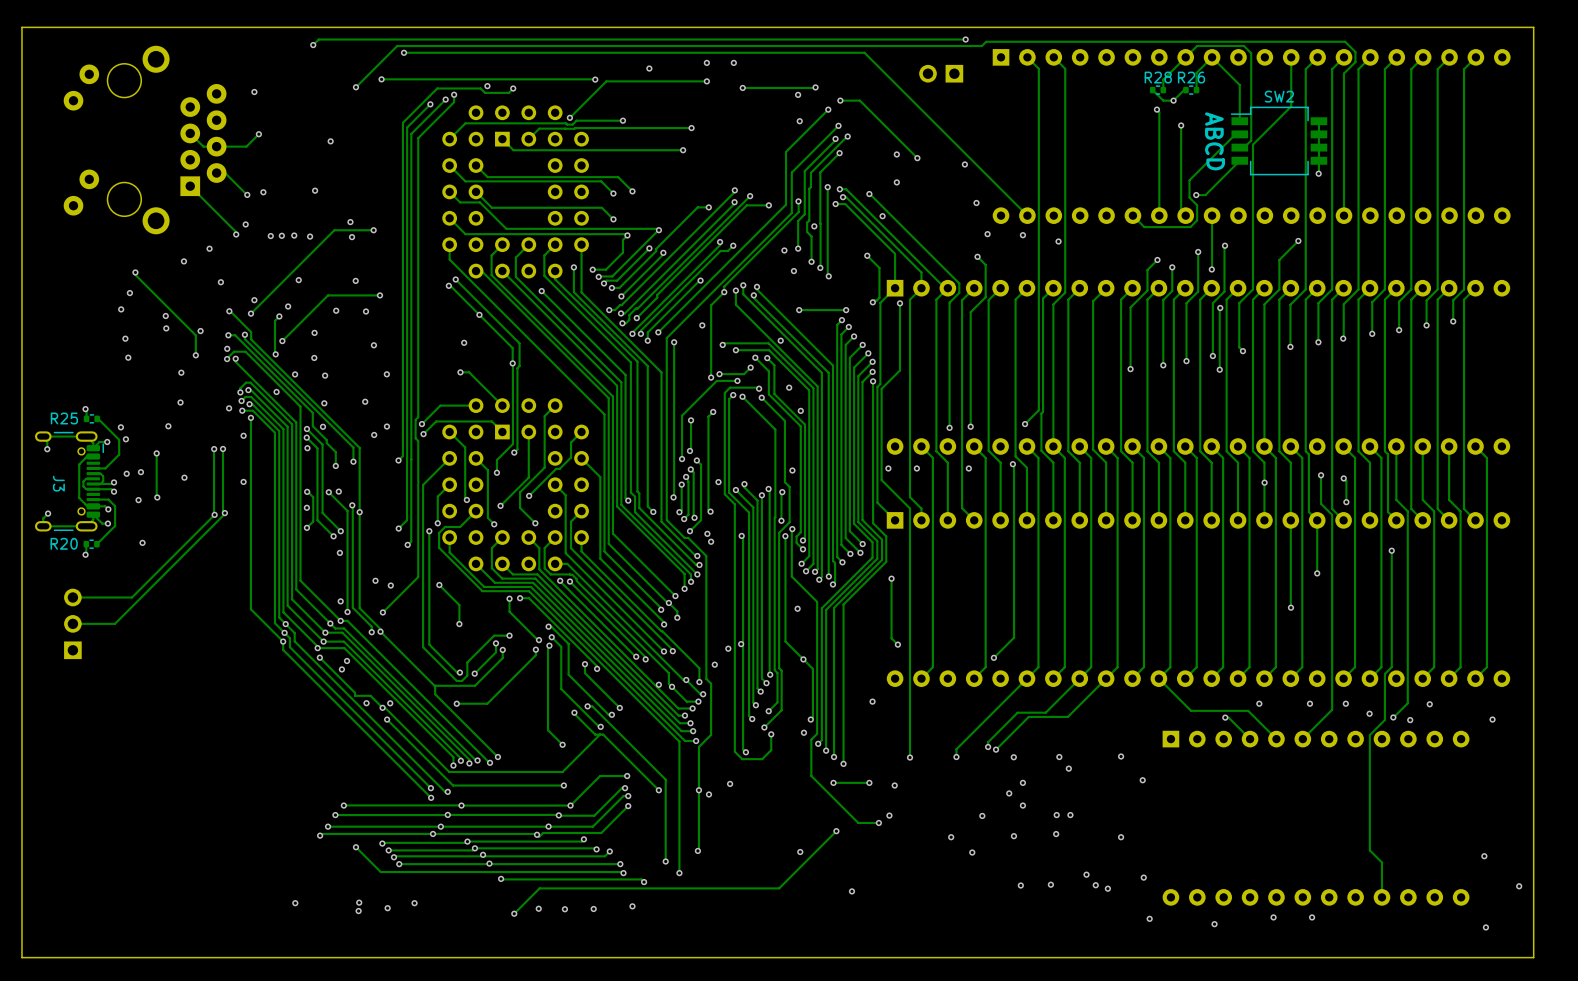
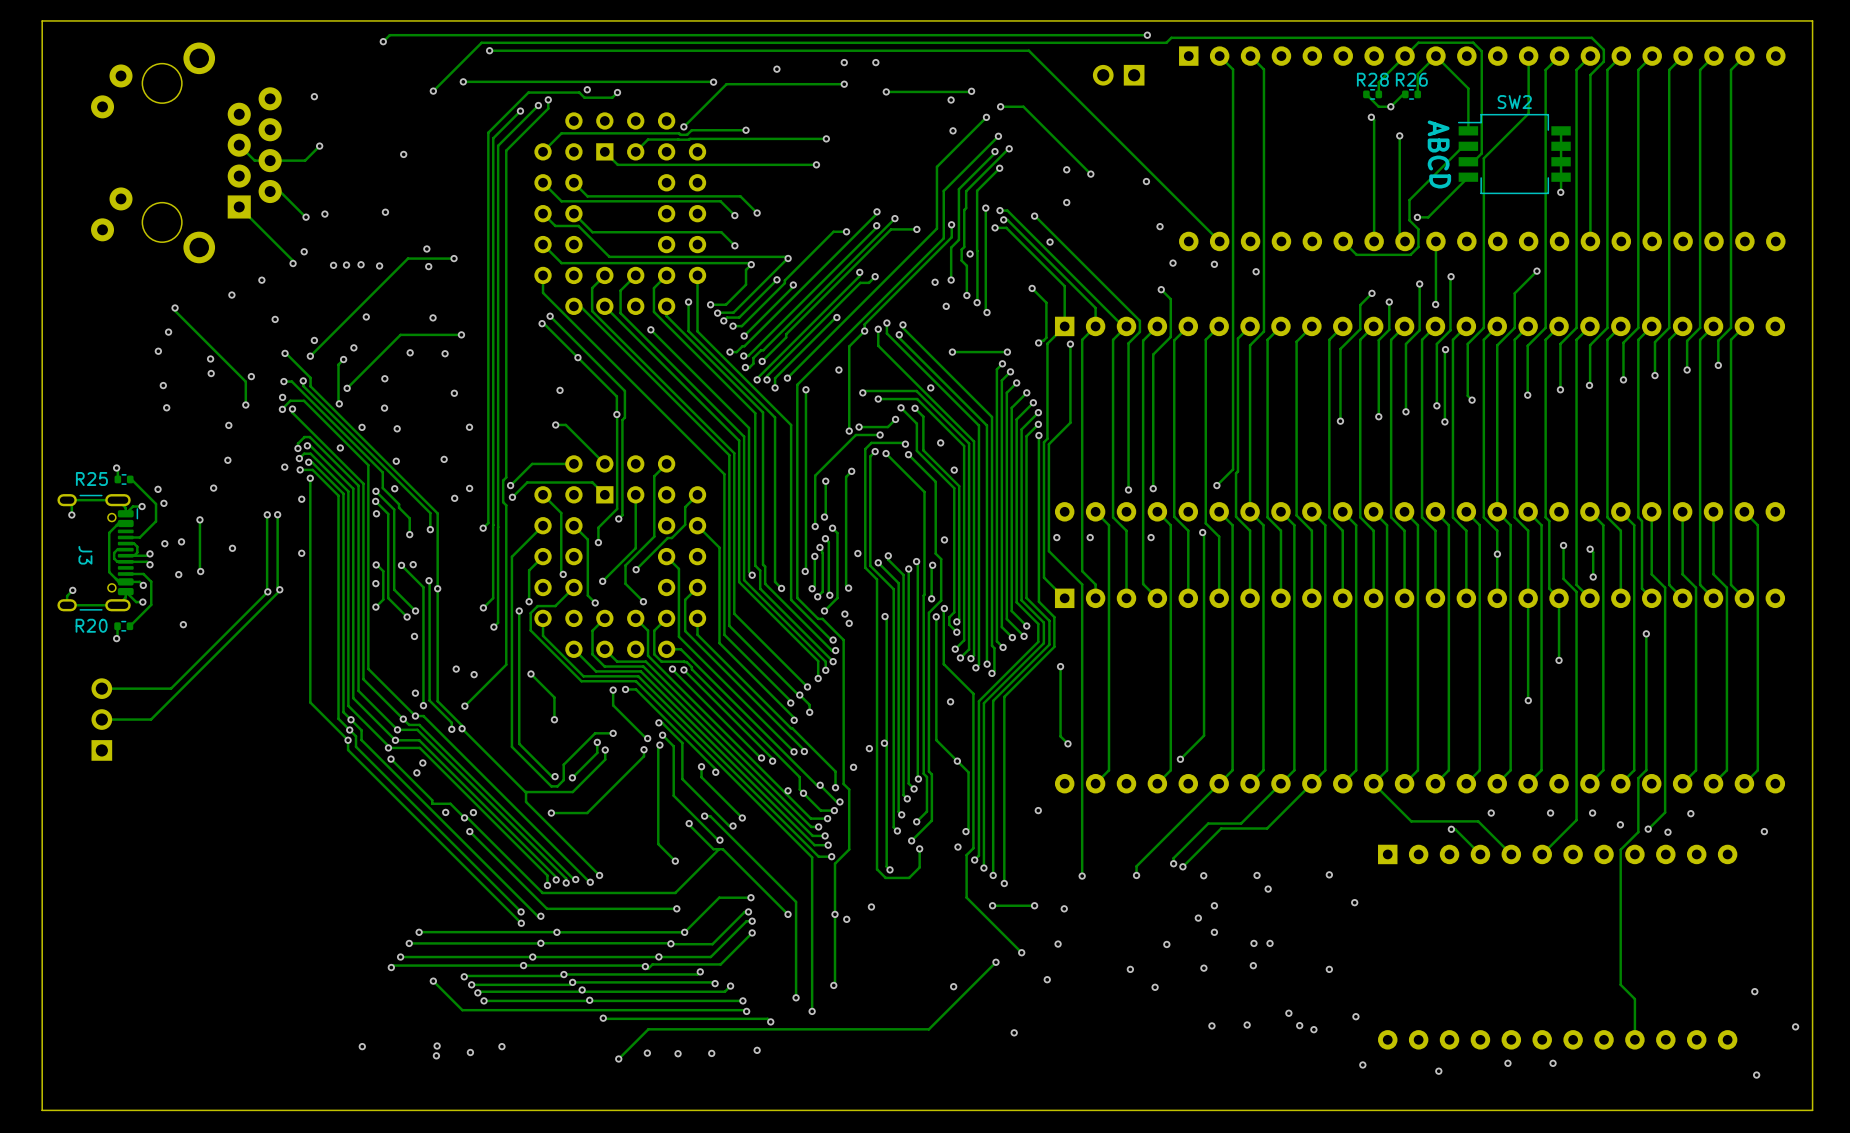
via: none -> (1021, 952)
track: (878, 822) (858, 822) -> none
via: (878, 822) -> none
via: none -> (1047, 979)

